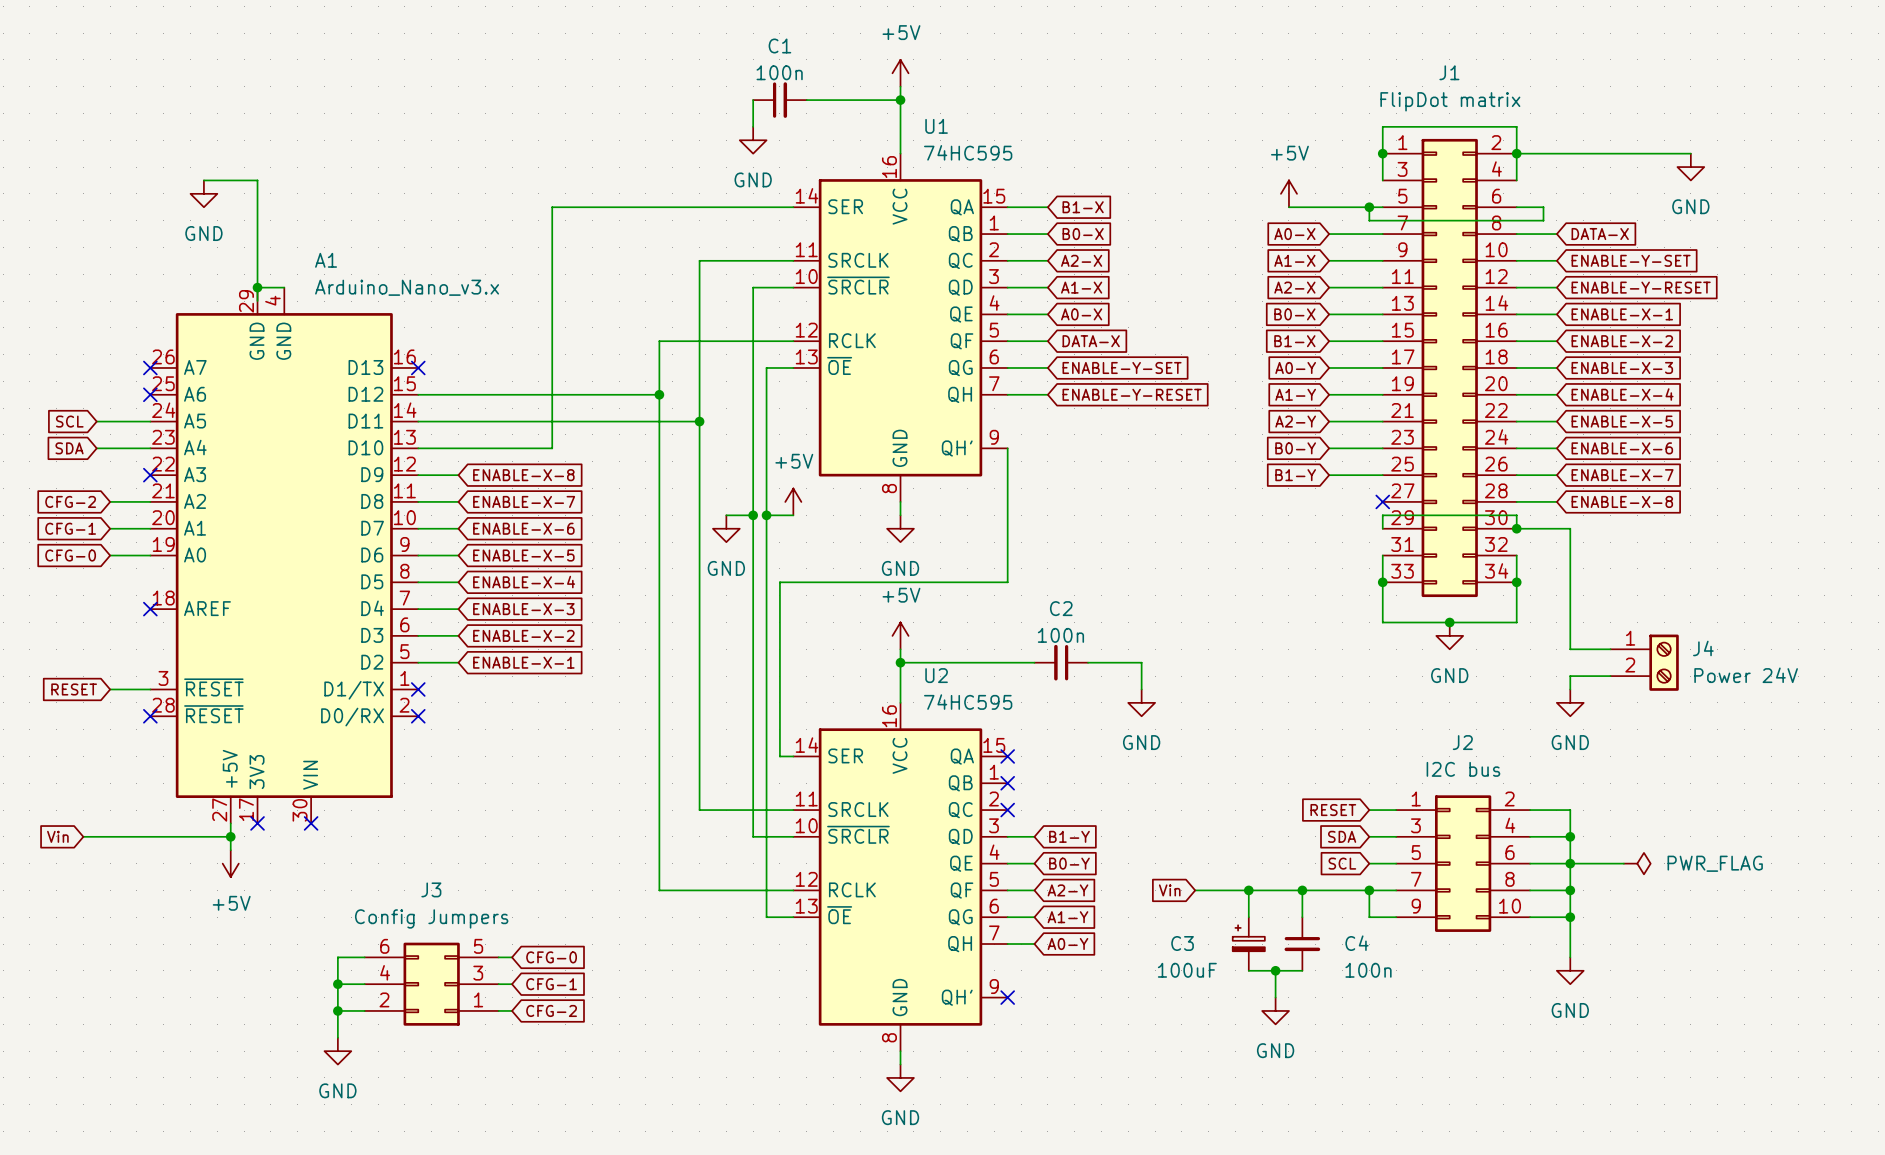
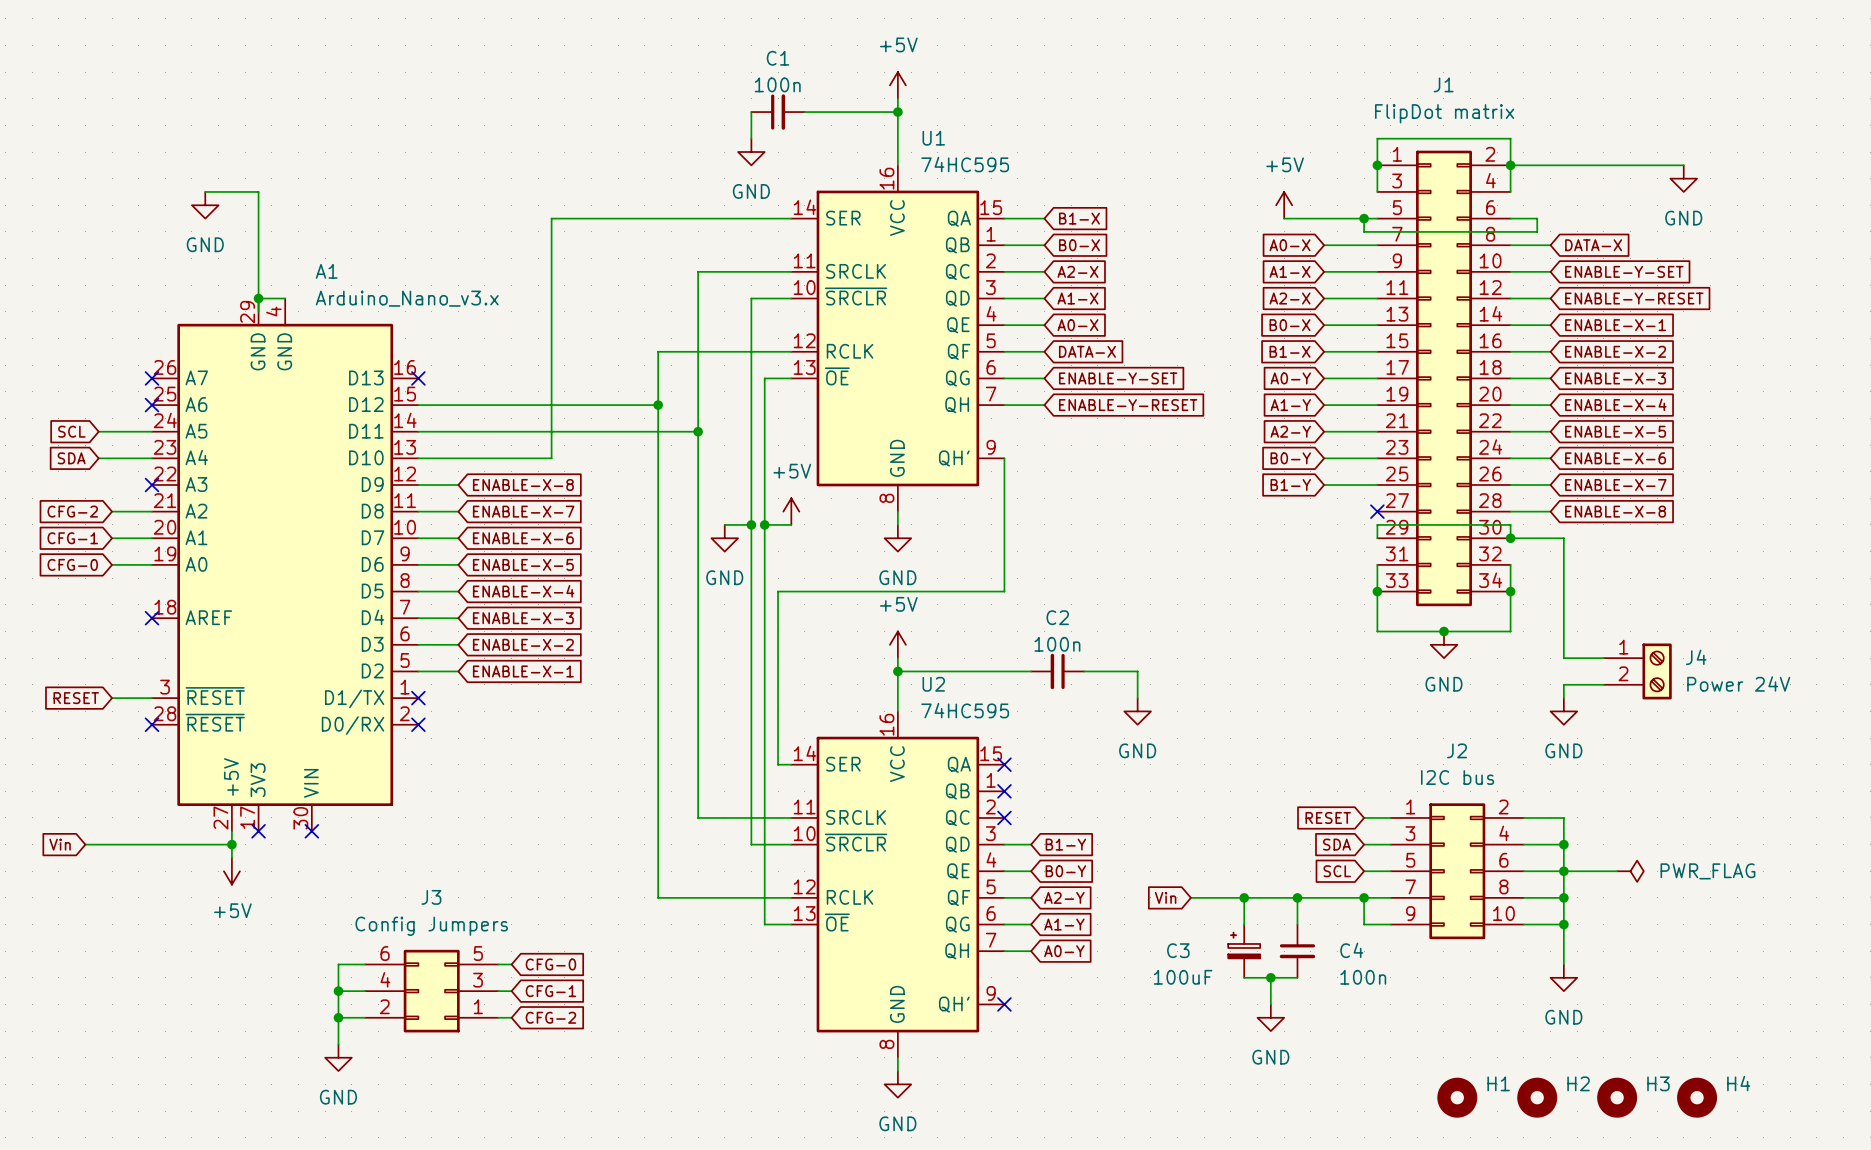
H1: none -> (1457, 1097)
H2: none -> (1537, 1097)
H3: none -> (1617, 1097)
H4: none -> (1697, 1097)

